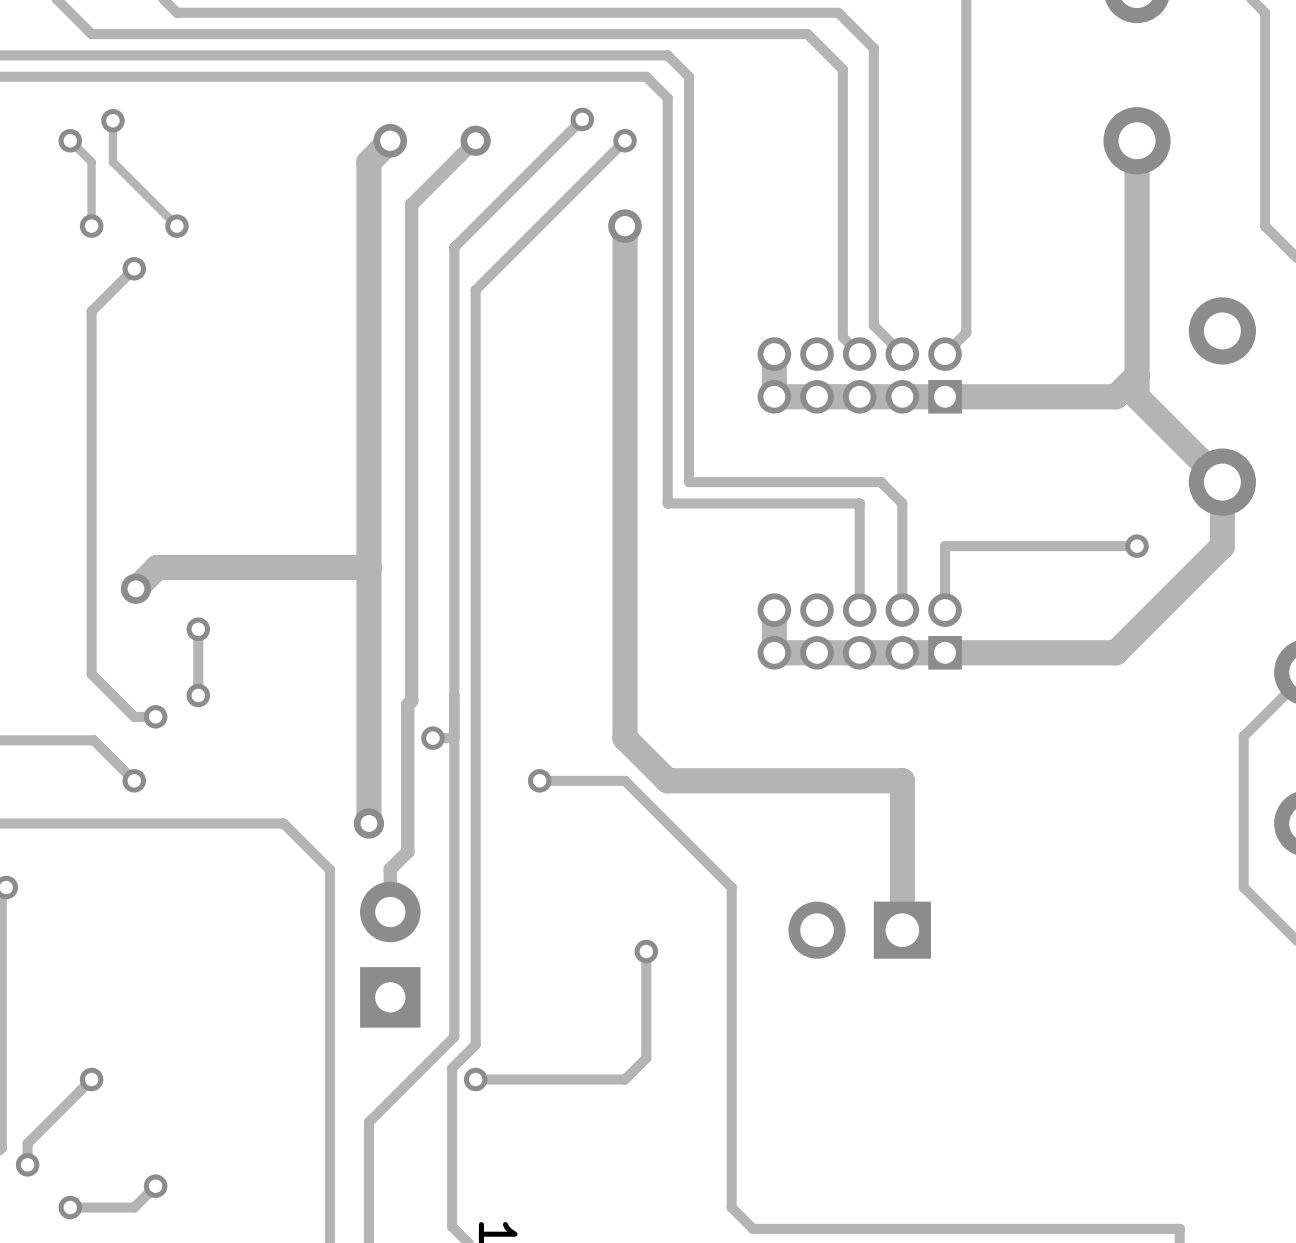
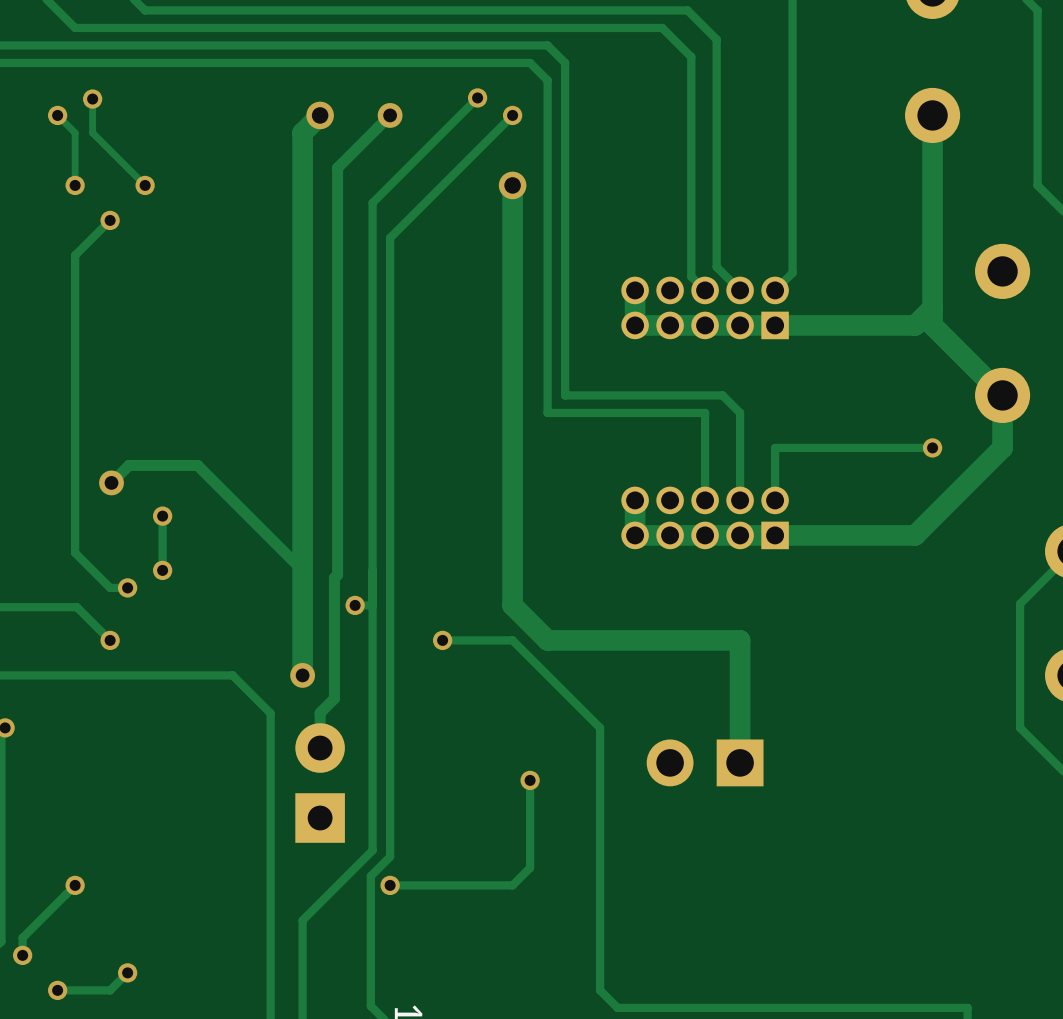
track: (240, 567) (368, 567) (368, 695) -> (197, 465) (302, 570)
track width: thick (240, 567) (157, 567) (135, 588) -> thin (197, 465) (129, 465) (111, 482)

